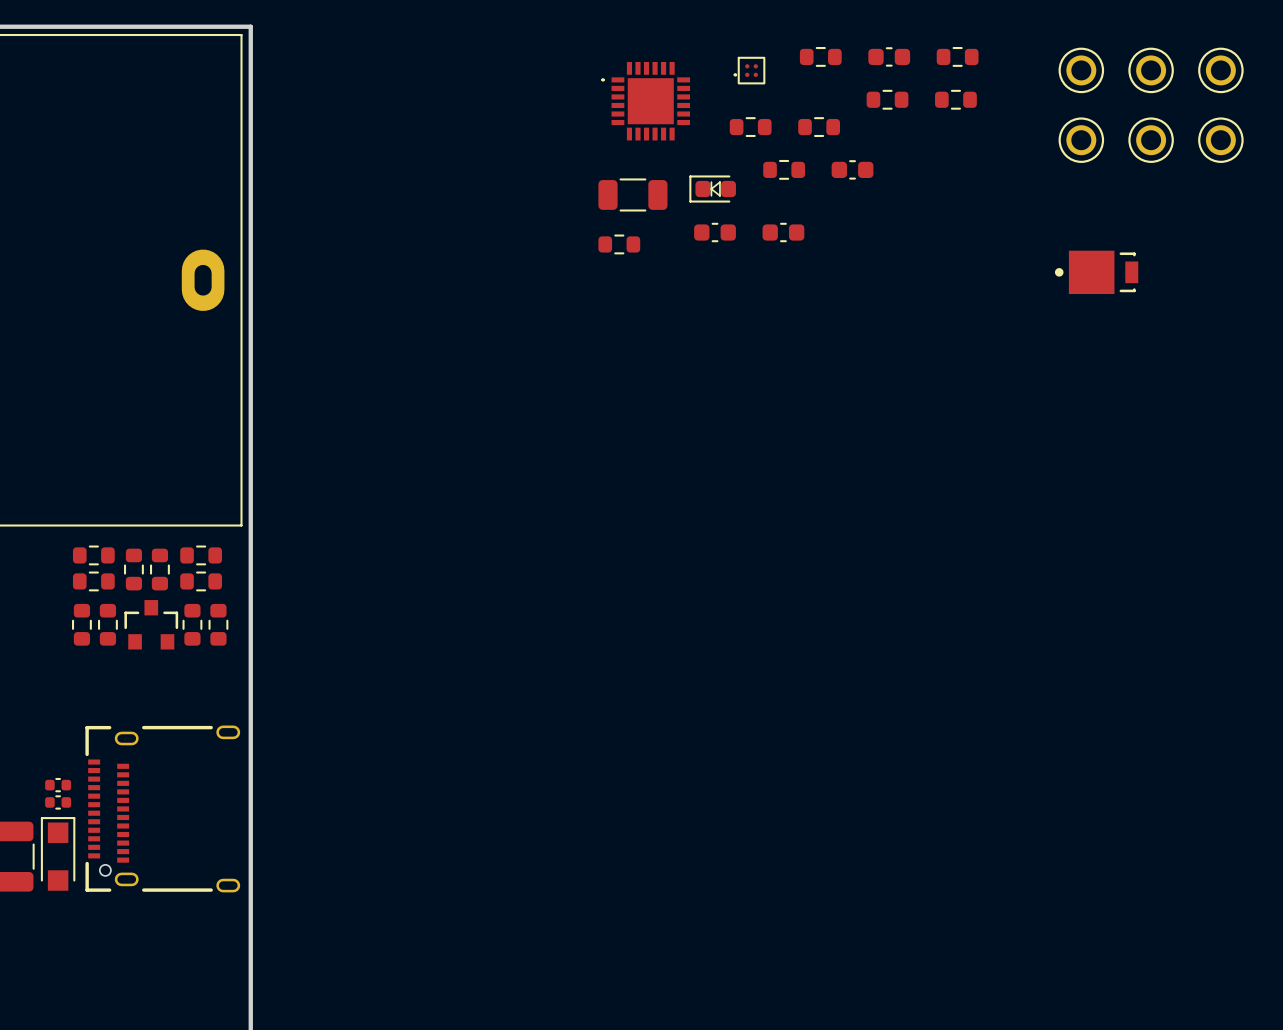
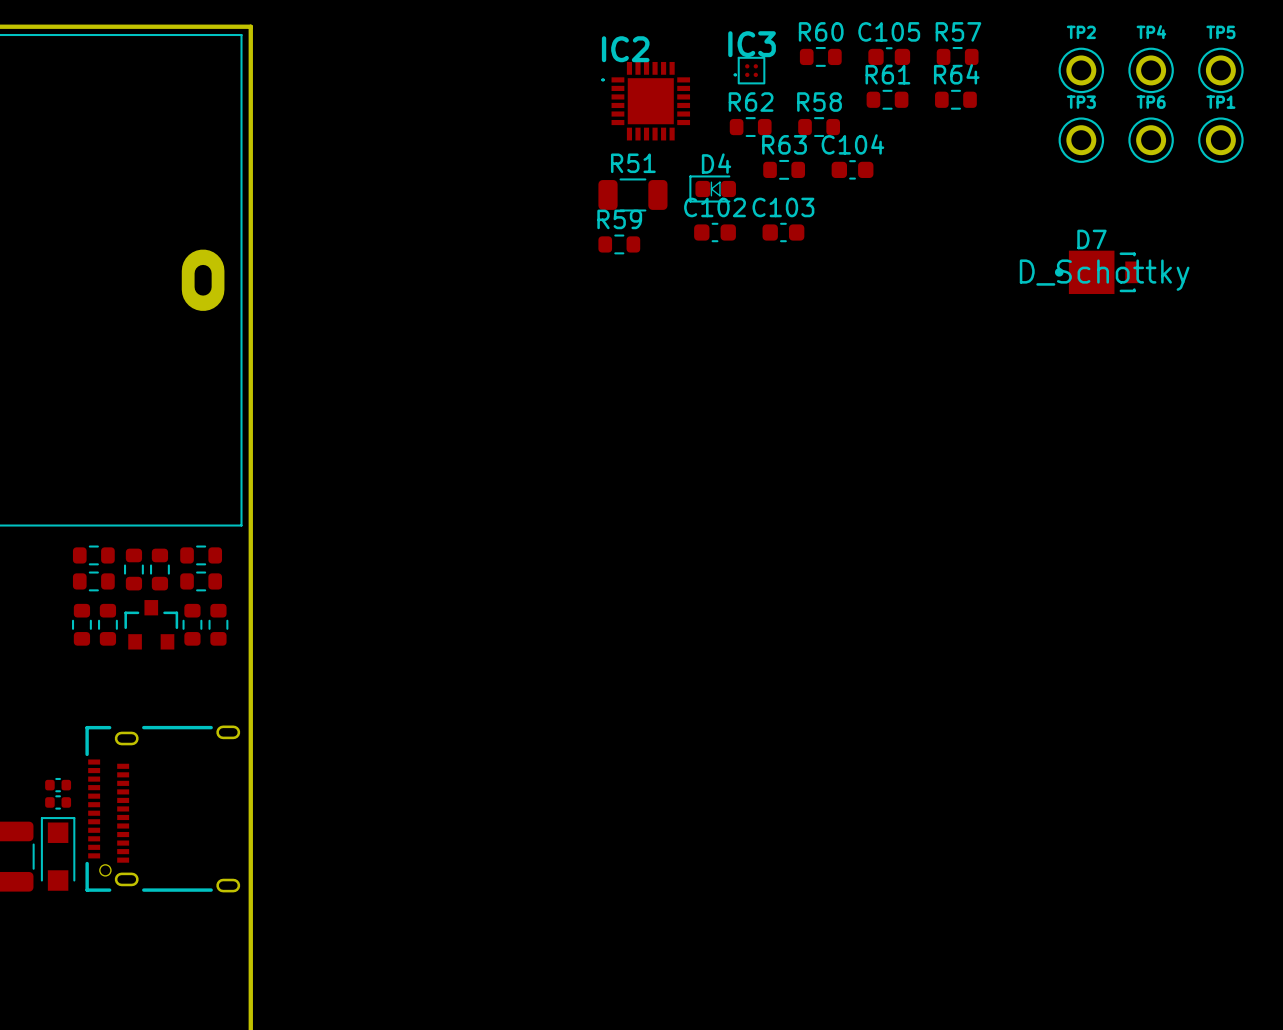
R60 name: none -> R60 (821, 31)
C105 name: none -> C105 (889, 31)
R57 name: none -> R57 (958, 31)
TP2 name: none -> TP2 (1081, 32)
TP4 name: none -> TP4 (1151, 32)
TP5 name: none -> TP5 (1220, 32)
IC3 name: none -> IC3 (752, 44)
IC2 name: none -> IC2 (625, 49)
R61 name: none -> R61 (887, 74)
R64 name: none -> R64 (956, 74)
R62 name: none -> R62 (751, 102)
R58 name: none -> R58 (819, 102)
TP3 name: none -> TP3 (1081, 102)
TP6 name: none -> TP6 (1151, 102)
TP1 name: none -> TP1 (1220, 102)
R63 name: none -> R63 (784, 144)
C104 name: none -> C104 (852, 144)
R51 name: none -> R51 (633, 163)
D4 name: none -> D4 (716, 163)
C102 name: none -> C102 (715, 207)
C103 name: none -> C103 (783, 207)
R59 name: none -> R59 (619, 219)
D7 name: none -> D7 (1091, 239)
D7 value: none -> D_Schottky (1104, 275)

